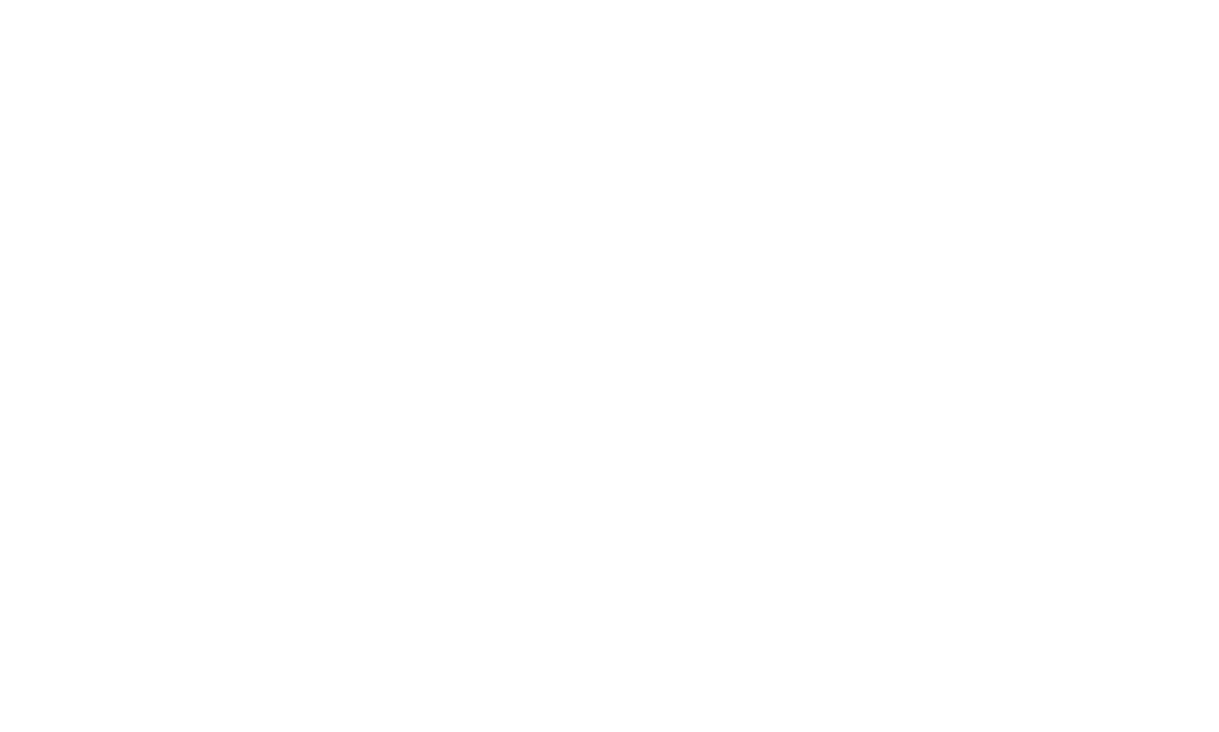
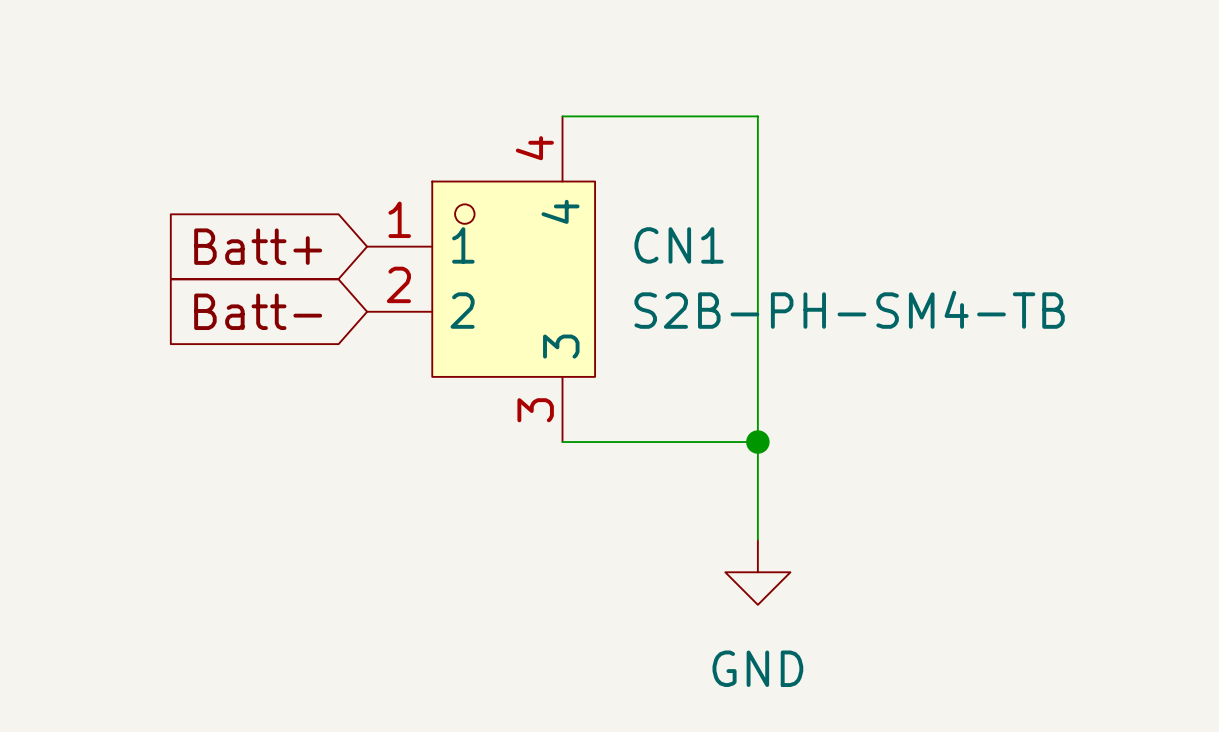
wire: none -> (562, 116) (757, 116) (757, 539)
global label: none -> Batt+ (258, 246)
CN1: none -> S2B-PH-SM4-TB (481, 279)
global label: none -> Batt- (258, 311)
wire: none -> (562, 442) (757, 442)
junction: none -> (757, 442)
power symbol: none -> GND (757, 572)

